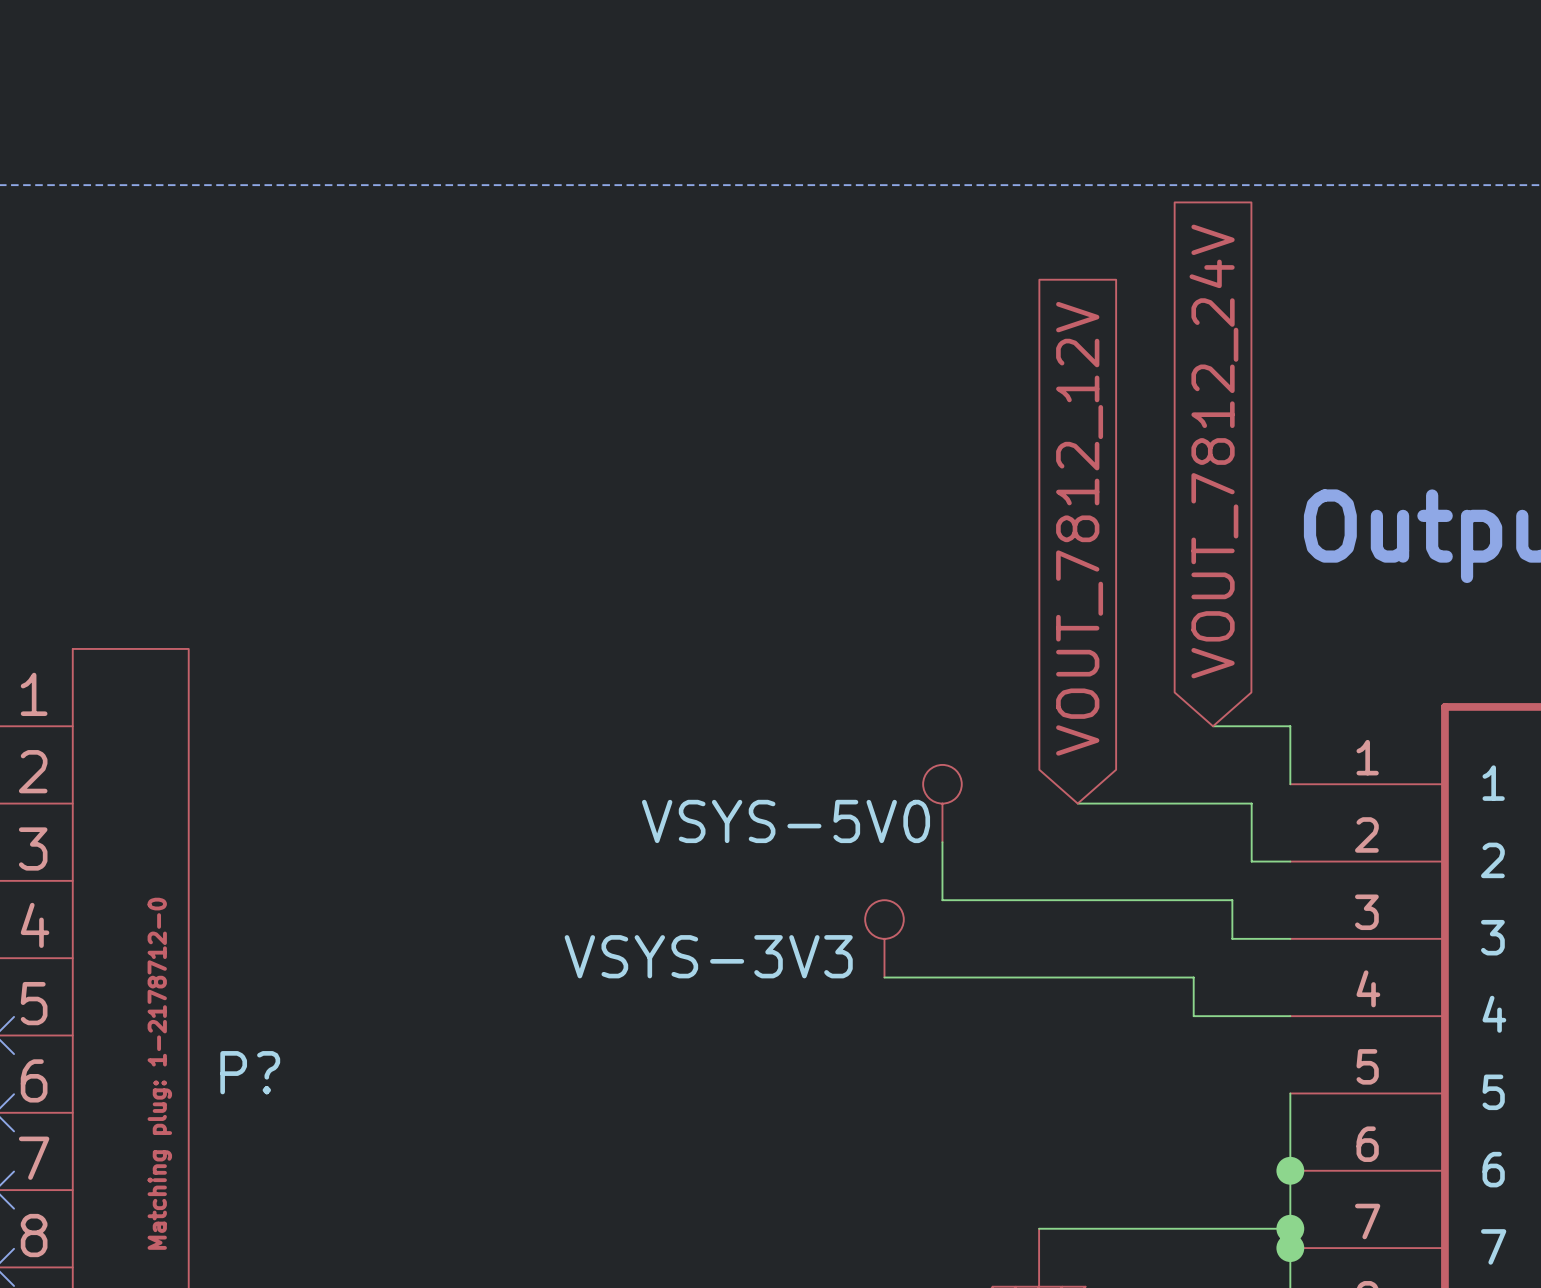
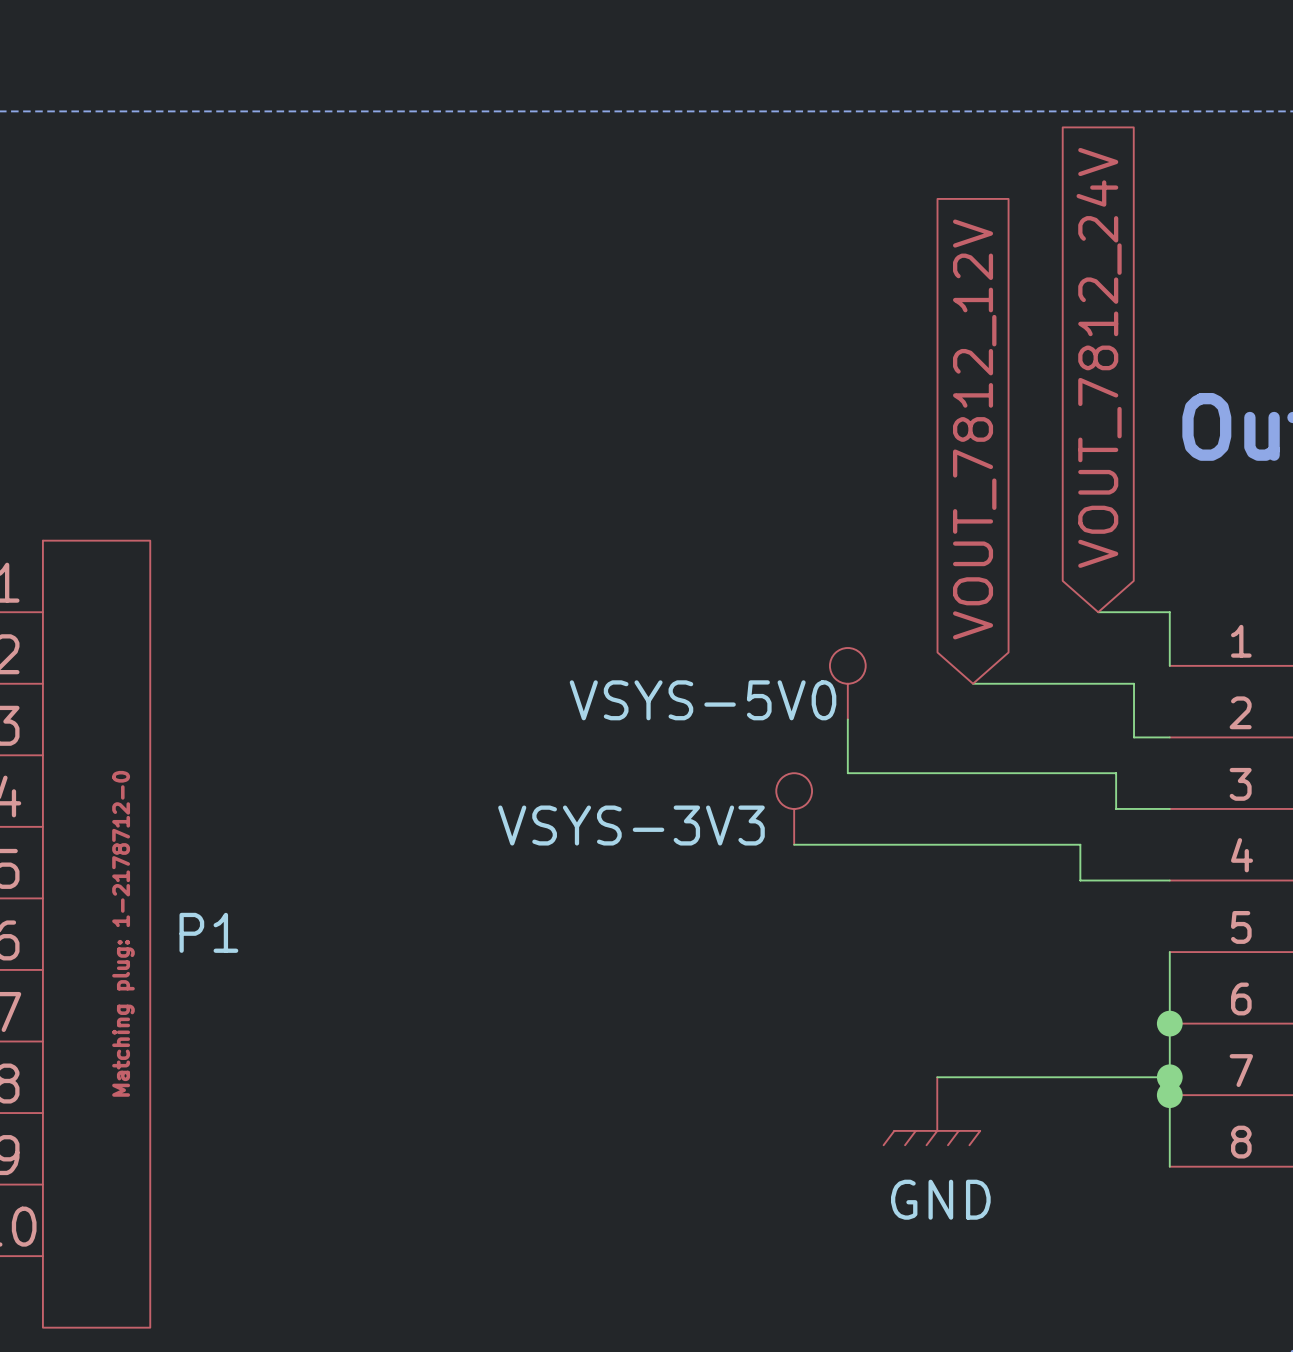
P? name: P? (250, 1072) -> P1 (208, 932)

